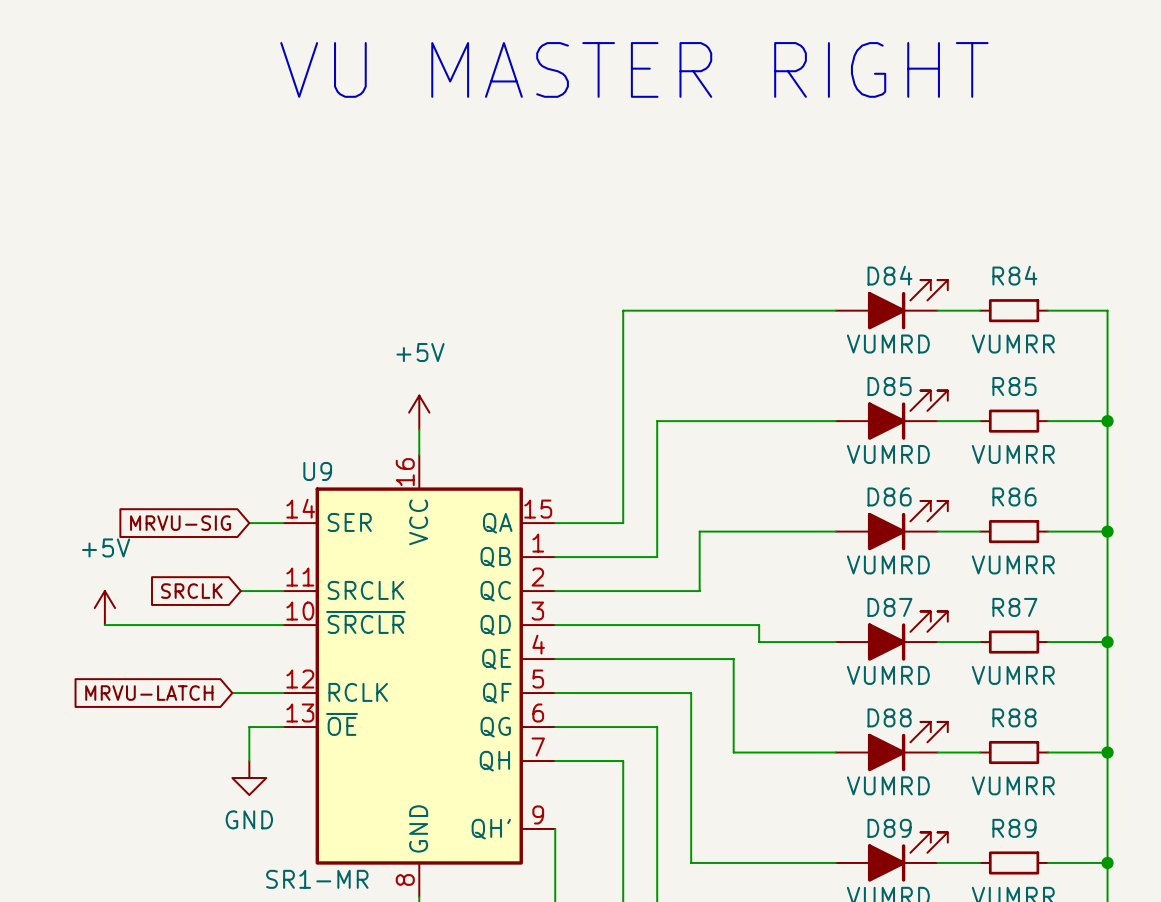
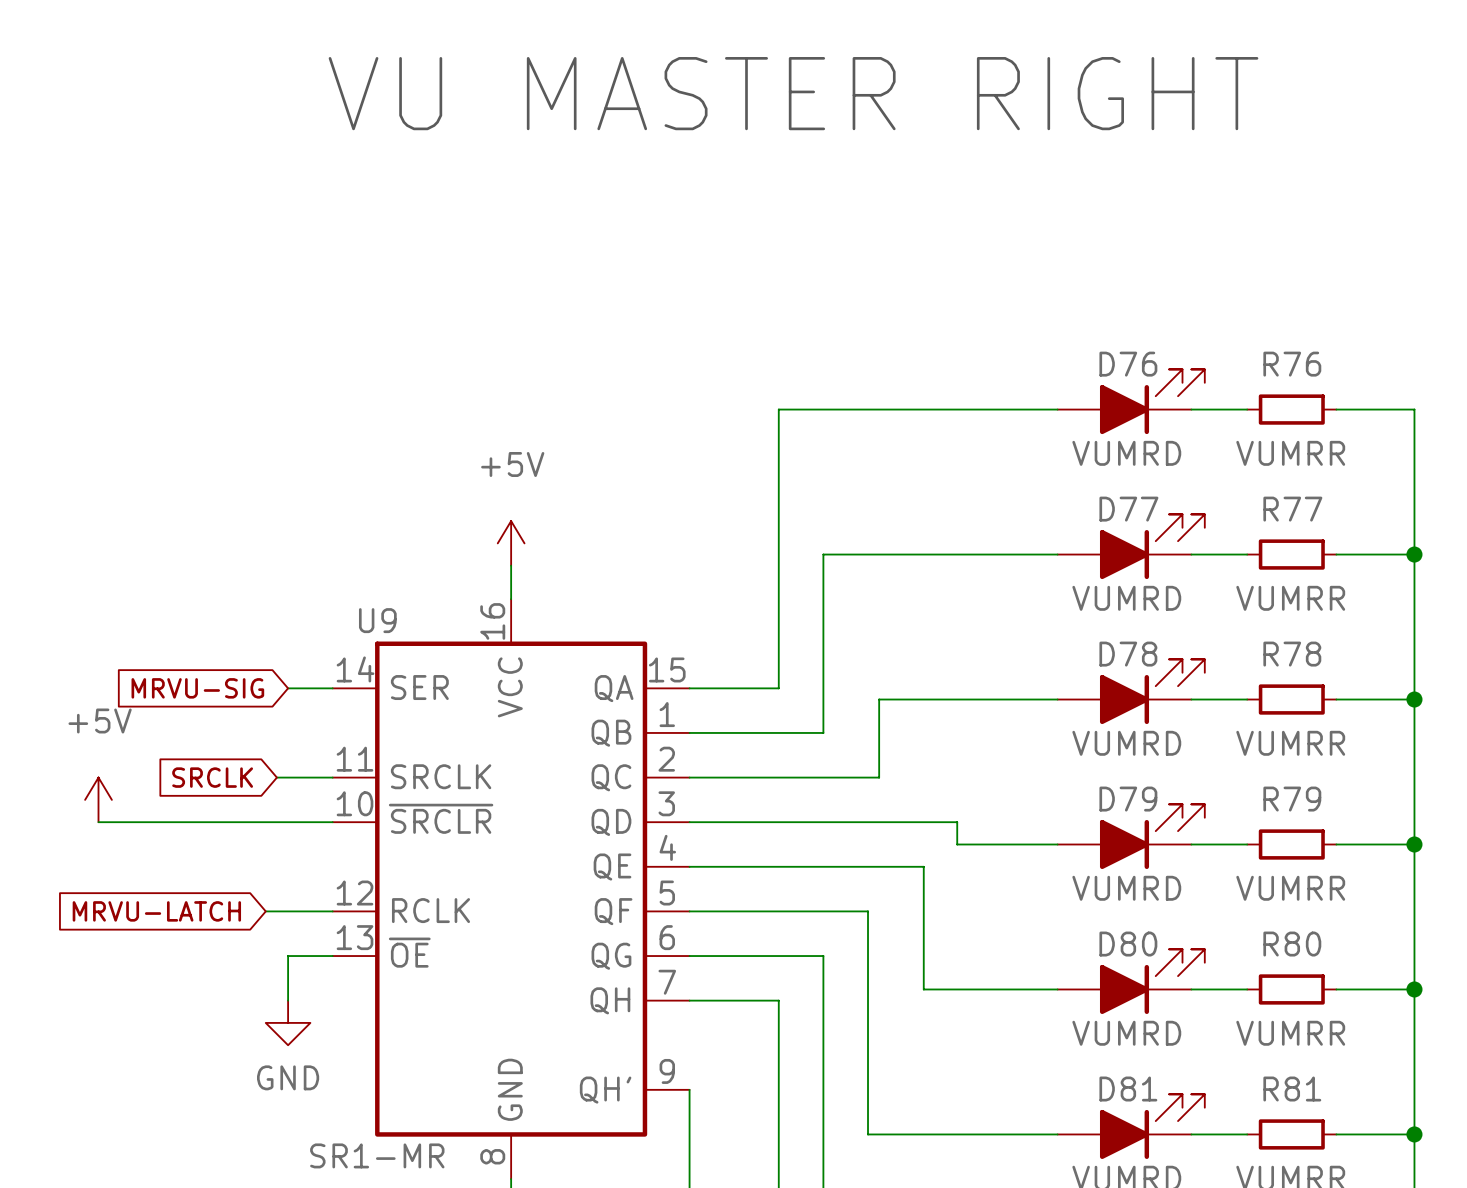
D84 name: D84 (889, 275) -> D76 (1128, 364)
R84 name: R84 (1014, 275) -> R76 (1292, 364)
D85 name: D85 (889, 386) -> D77 (1128, 509)
R85 name: R85 (1014, 386) -> R77 (1292, 509)
D86 name: D86 (889, 496) -> D78 (1128, 654)
R86 name: R86 (1014, 496) -> R78 (1292, 654)
D87 name: D87 (889, 607) -> D79 (1128, 799)
R87 name: R87 (1014, 607) -> R79 (1292, 799)
D88 name: D88 (889, 717) -> D80 (1128, 944)
R88 name: R88 (1014, 717) -> R80 (1292, 944)
D89 name: D89 (889, 828) -> D81 (1128, 1089)
R89 name: R89 (1014, 828) -> R81 (1292, 1089)

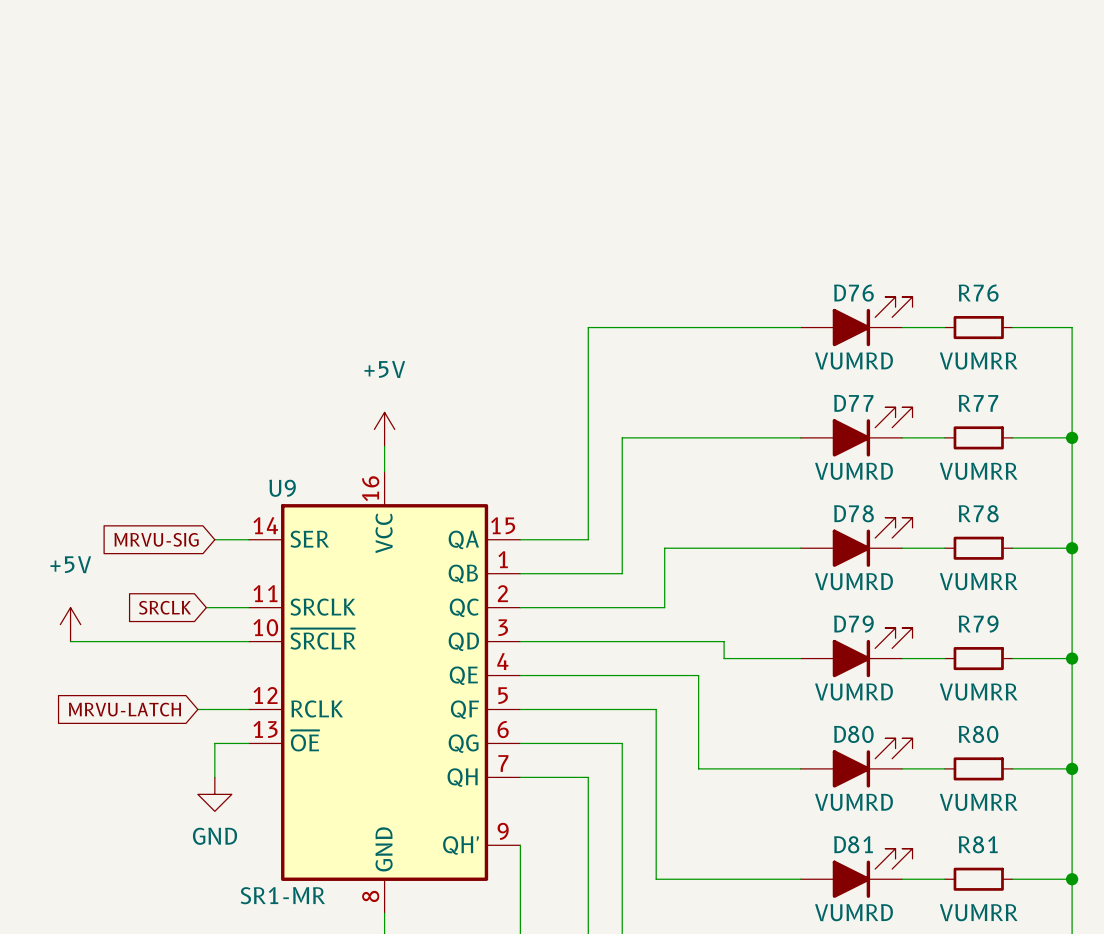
text: VU MASTER RIGHT (793, 93) -> none

